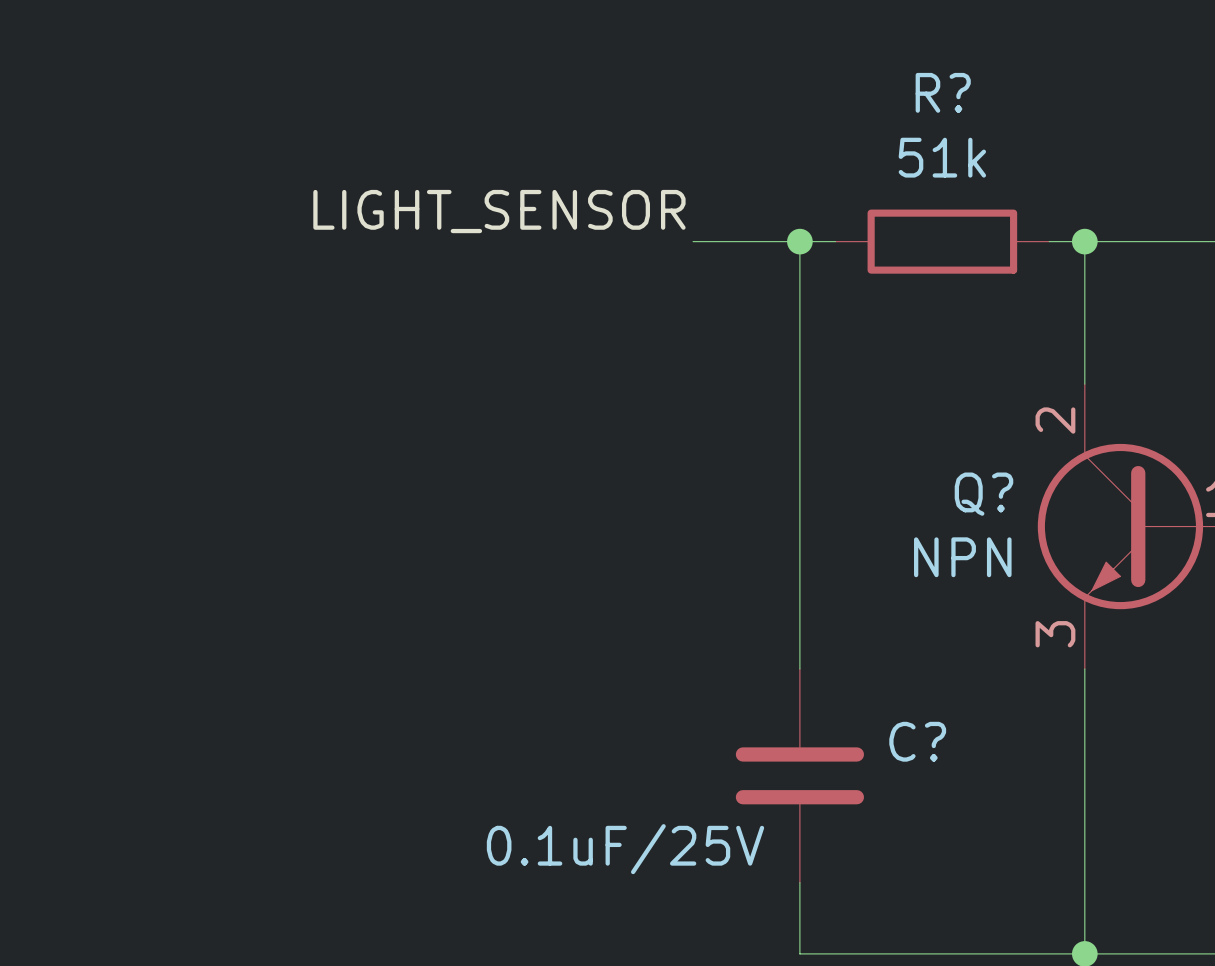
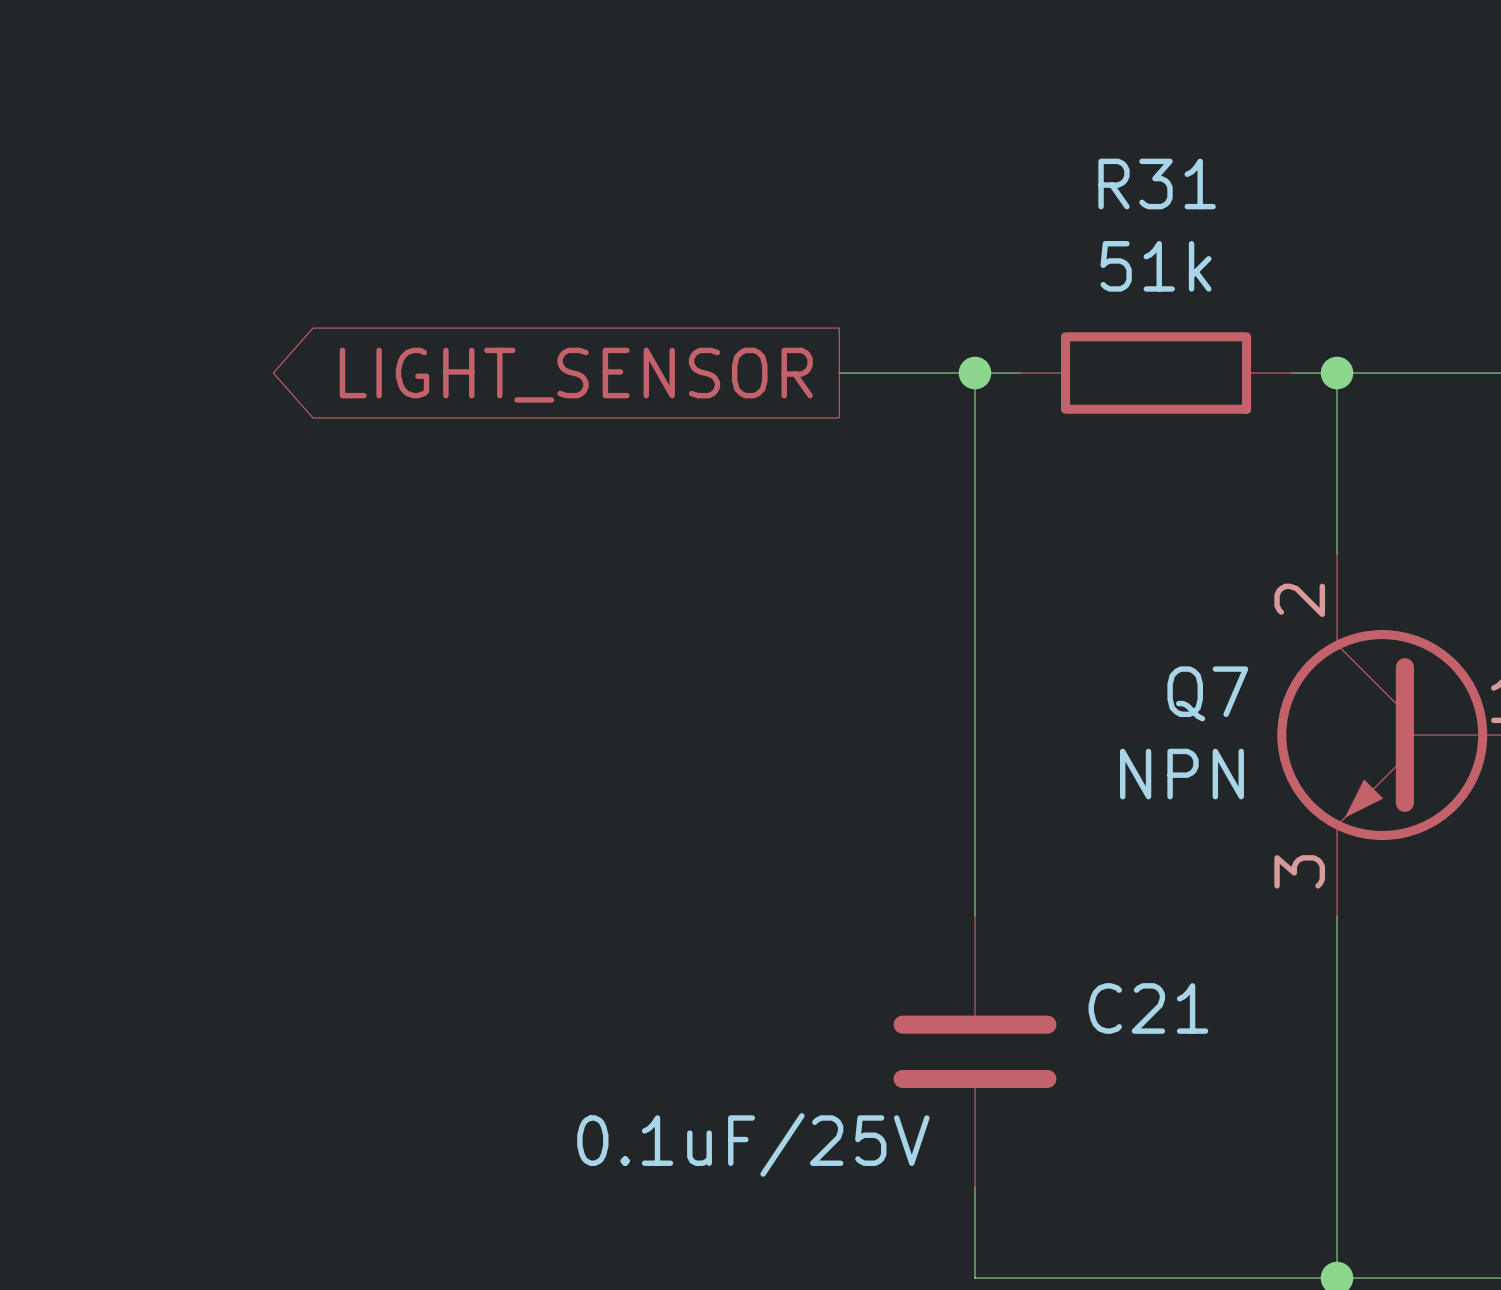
R? name: R? (943, 92) -> R31 (1157, 183)
label: LIGHT_SENSOR (499, 211) -> none
global label: none -> LIGHT_SENSOR (576, 375)
Q? name: Q? (983, 494) -> Q7 (1207, 693)
C? name: C? (917, 741) -> C21 (1148, 1008)

